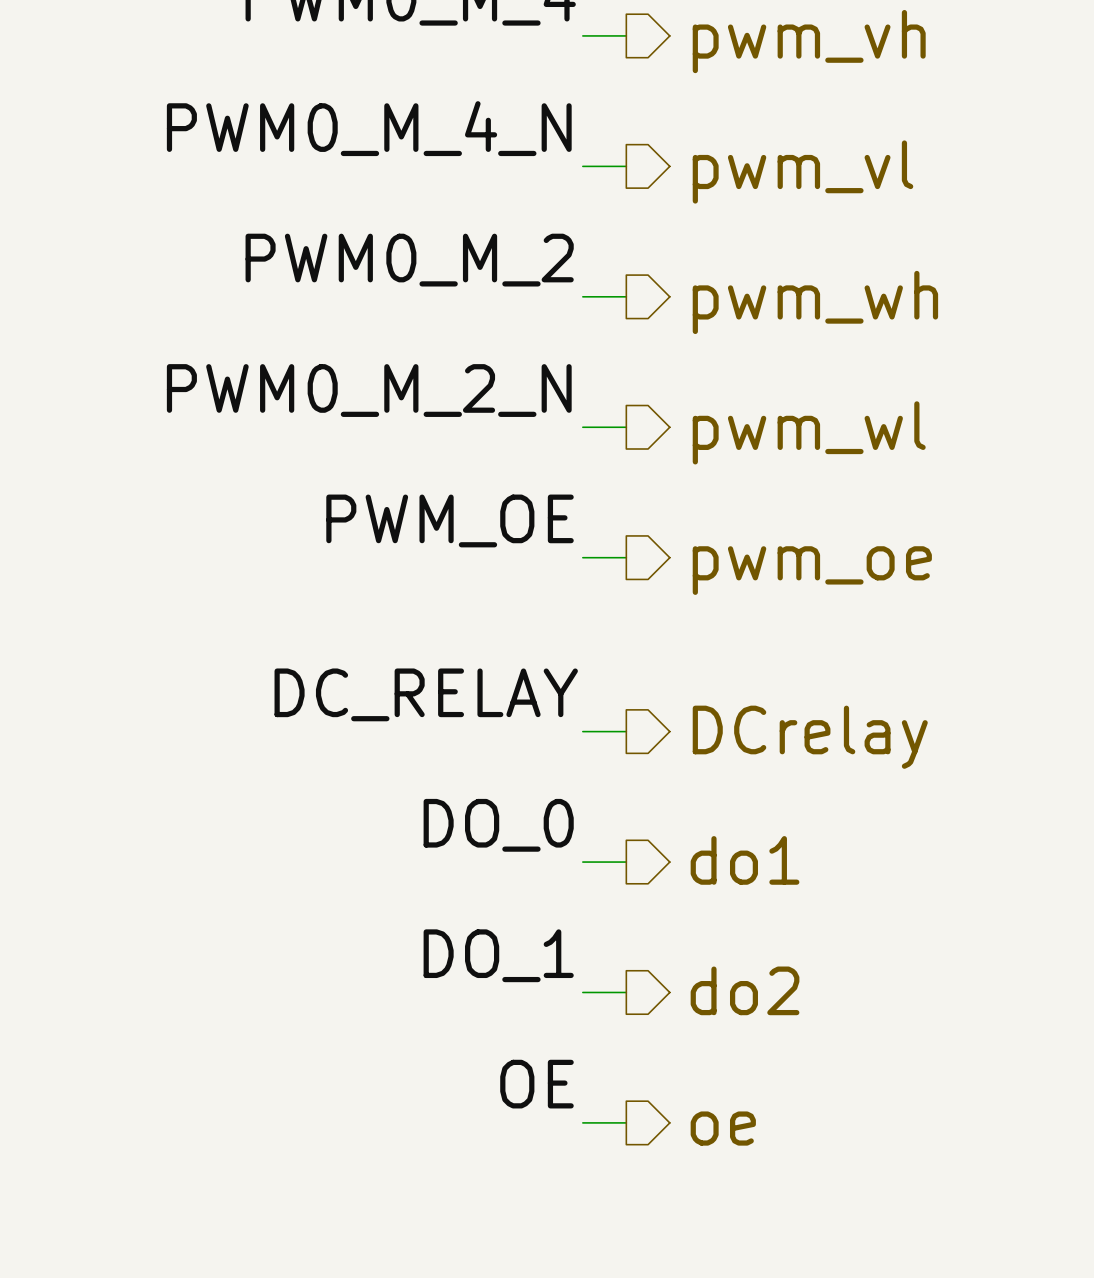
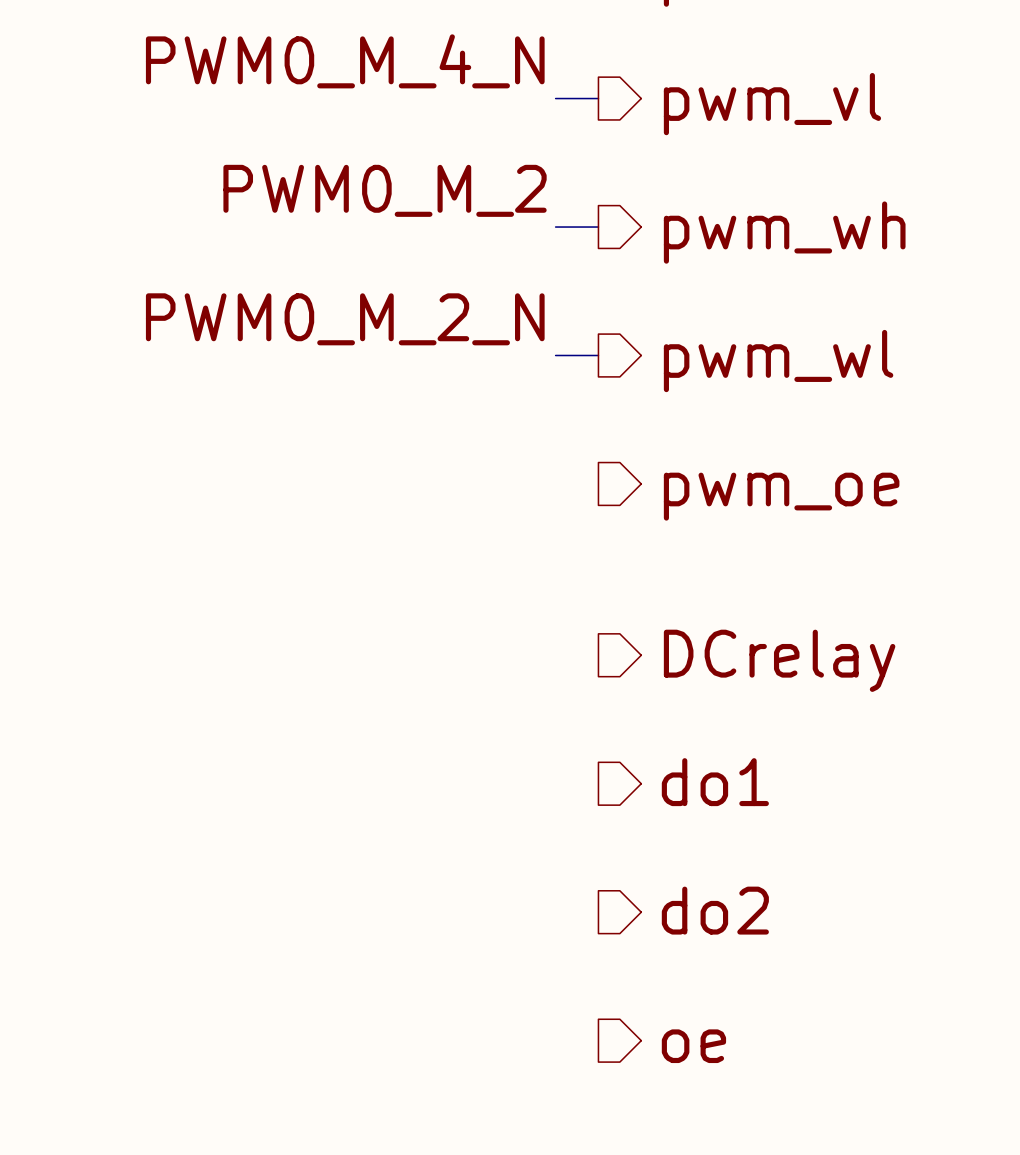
label: PWM_OE (450, 520) -> none
wire: (582, 557) (626, 557) -> none
label: DC_RELAY (426, 694) -> none
wire: (582, 731) (626, 731) -> none
label: DO_0 (498, 825) -> none
wire: (582, 862) (626, 862) -> none
label: DO_1 (498, 955) -> none
wire: (582, 992) (626, 992) -> none
label: OE (536, 1084) -> none
wire: (582, 1122) (626, 1122) -> none

